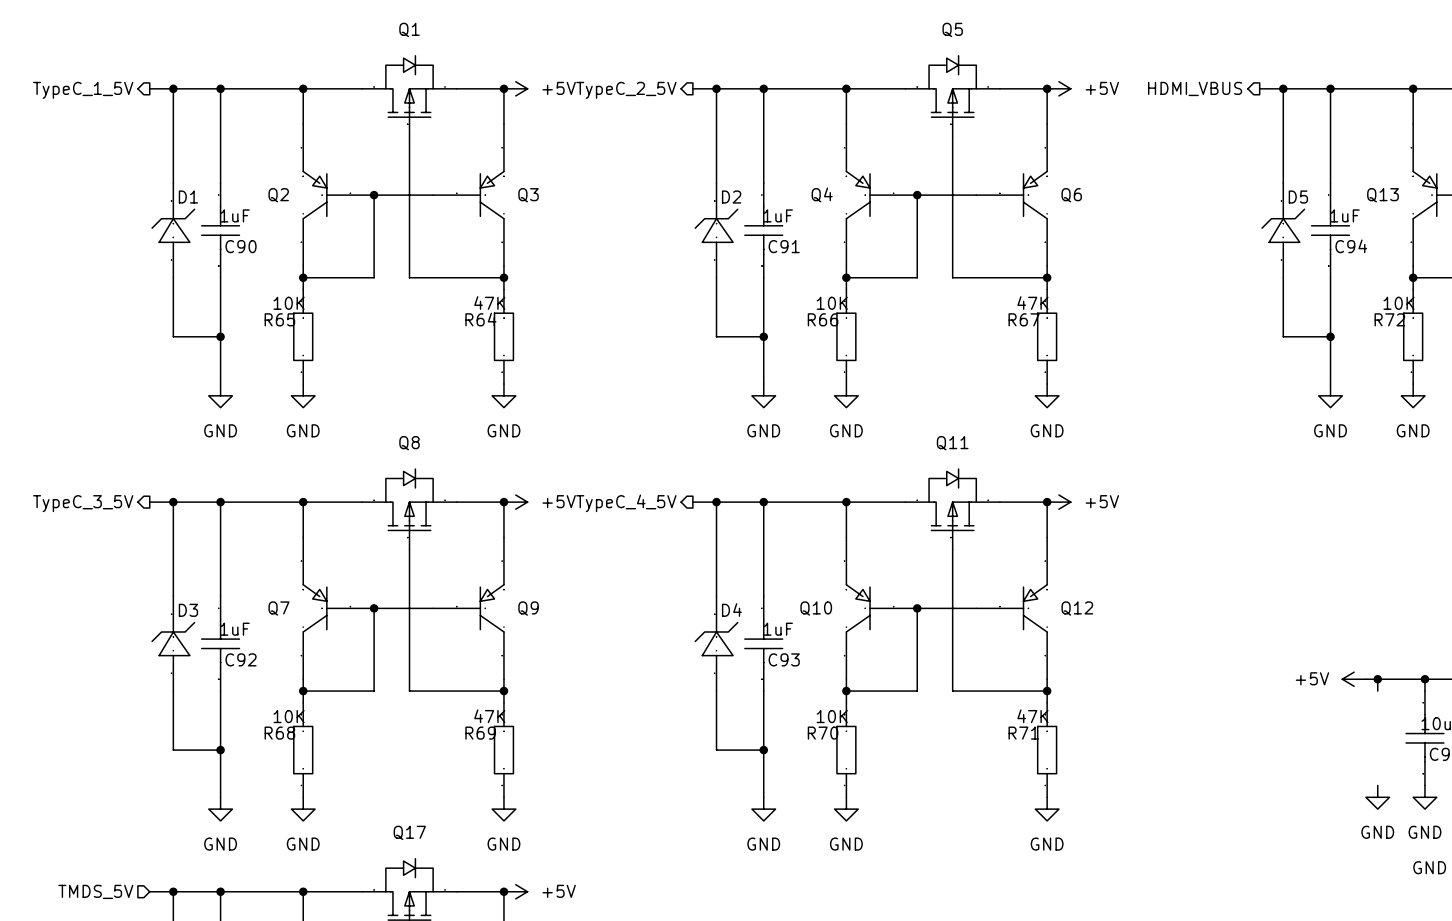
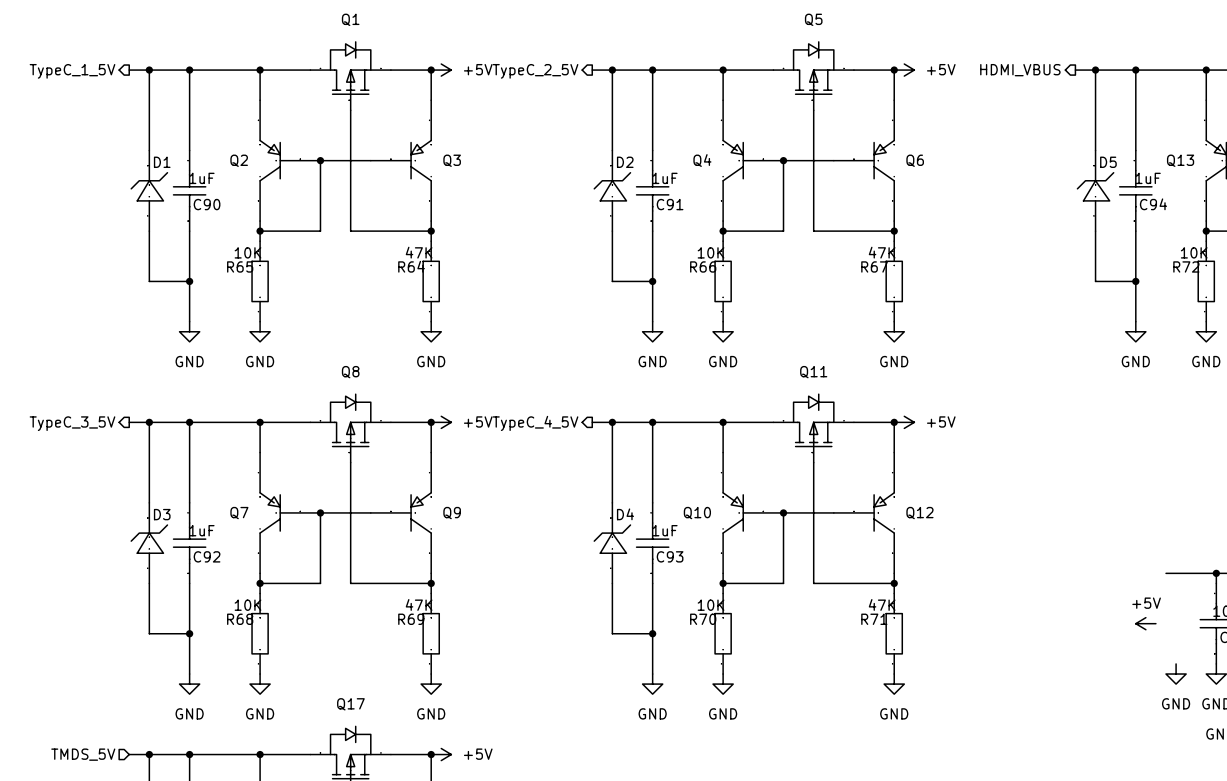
power symbol text position: +5V (1312, 678) -> +5V (1146, 603)
power symbol position: +5V (1354, 679) -> +5V (1145, 623)
wire: (1377, 679) (1377, 691) -> none
junction: (1377, 679) -> none

